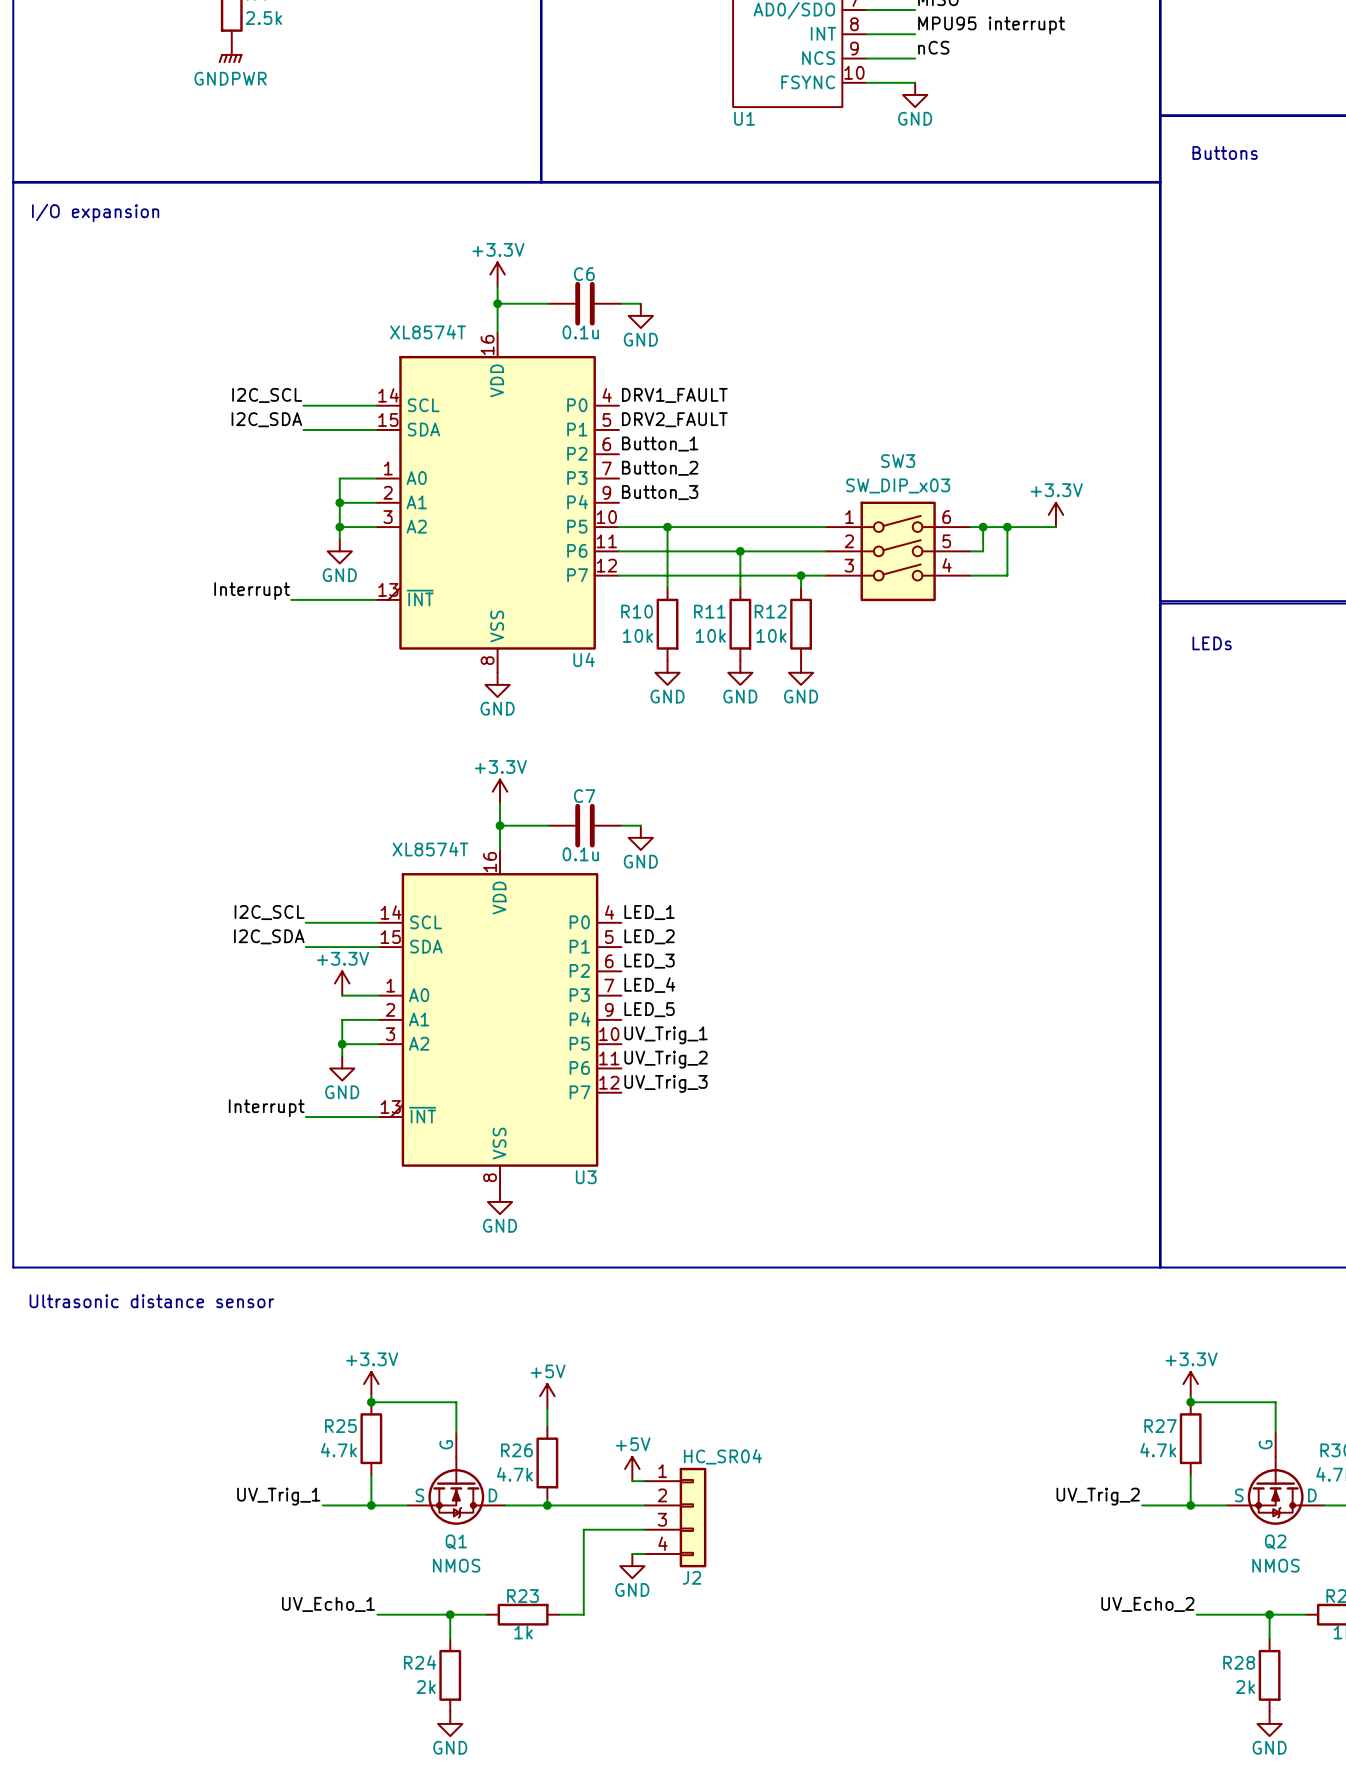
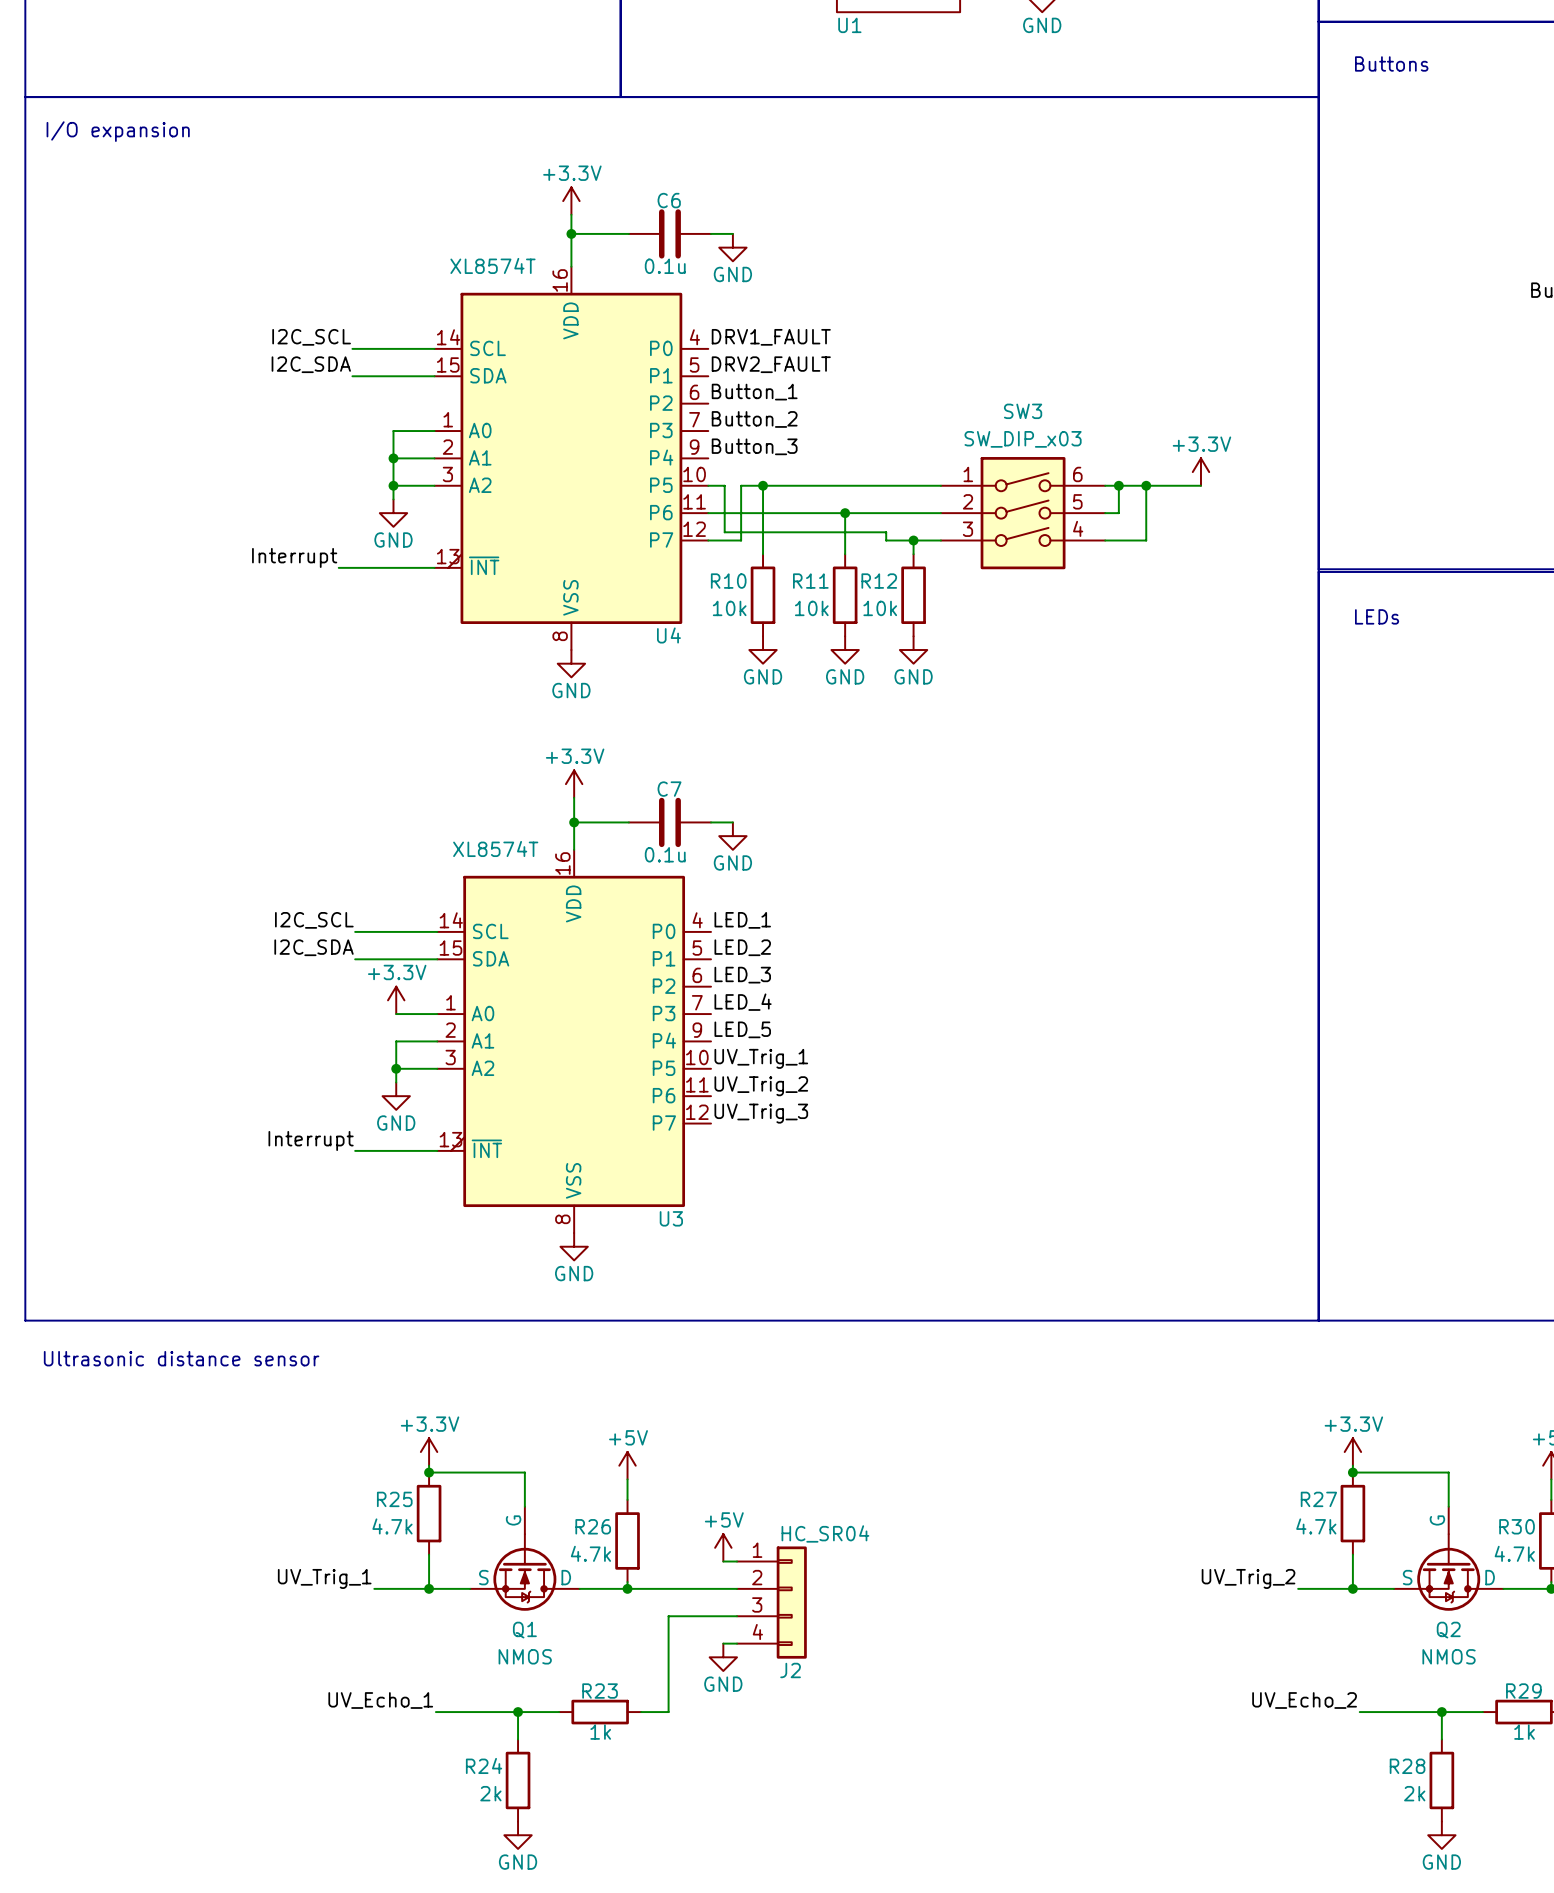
wire: (633, 527) (648, 527) -> (741, 540) (741, 485)
wire: (648, 575) (776, 575) -> (724, 485) (724, 532) (886, 532) (886, 540)

